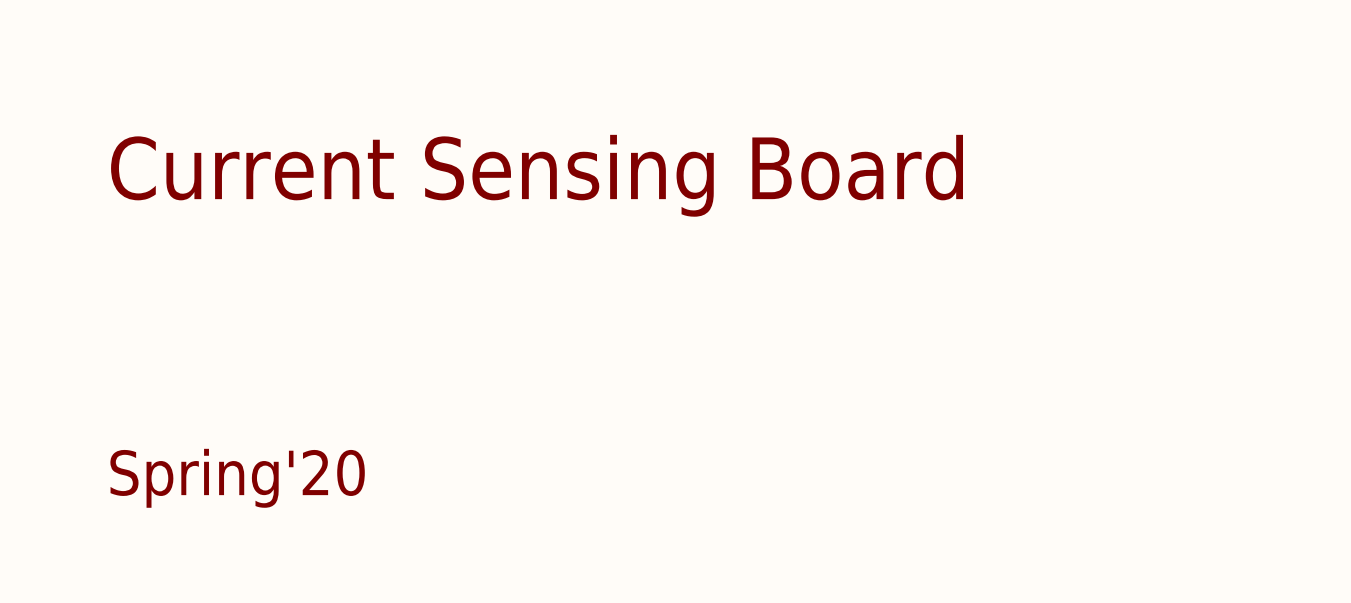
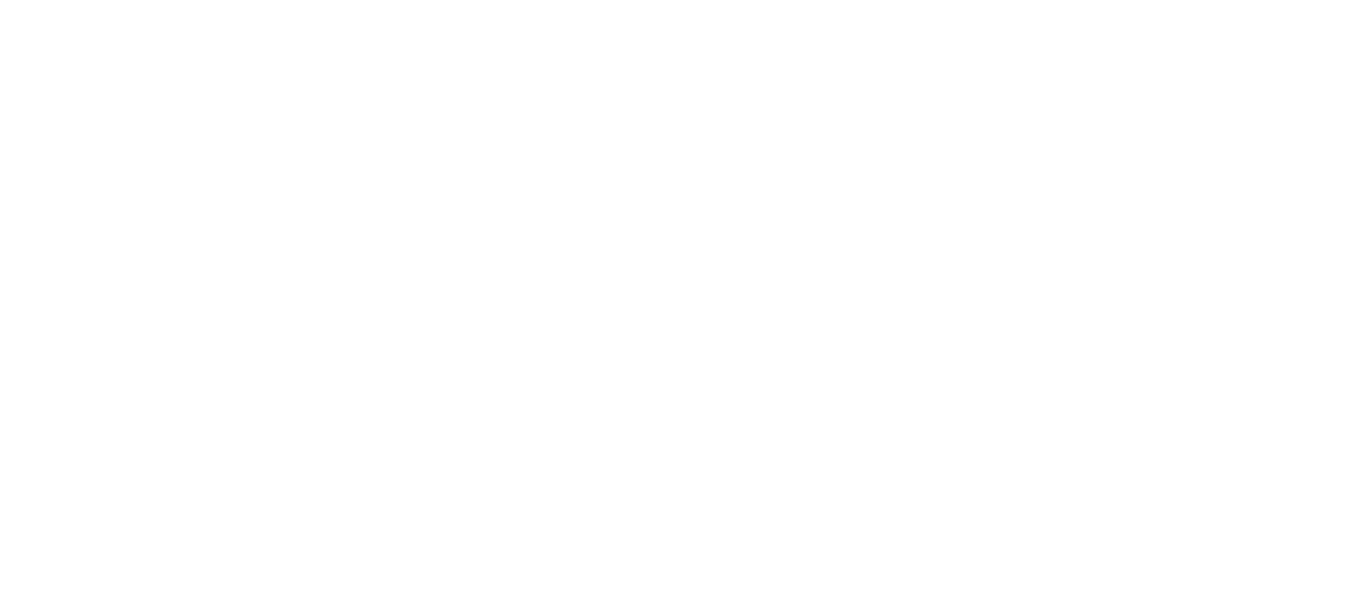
text: Current Sensing Board (537, 175) -> none
text: Spring'20 (237, 478) -> none

